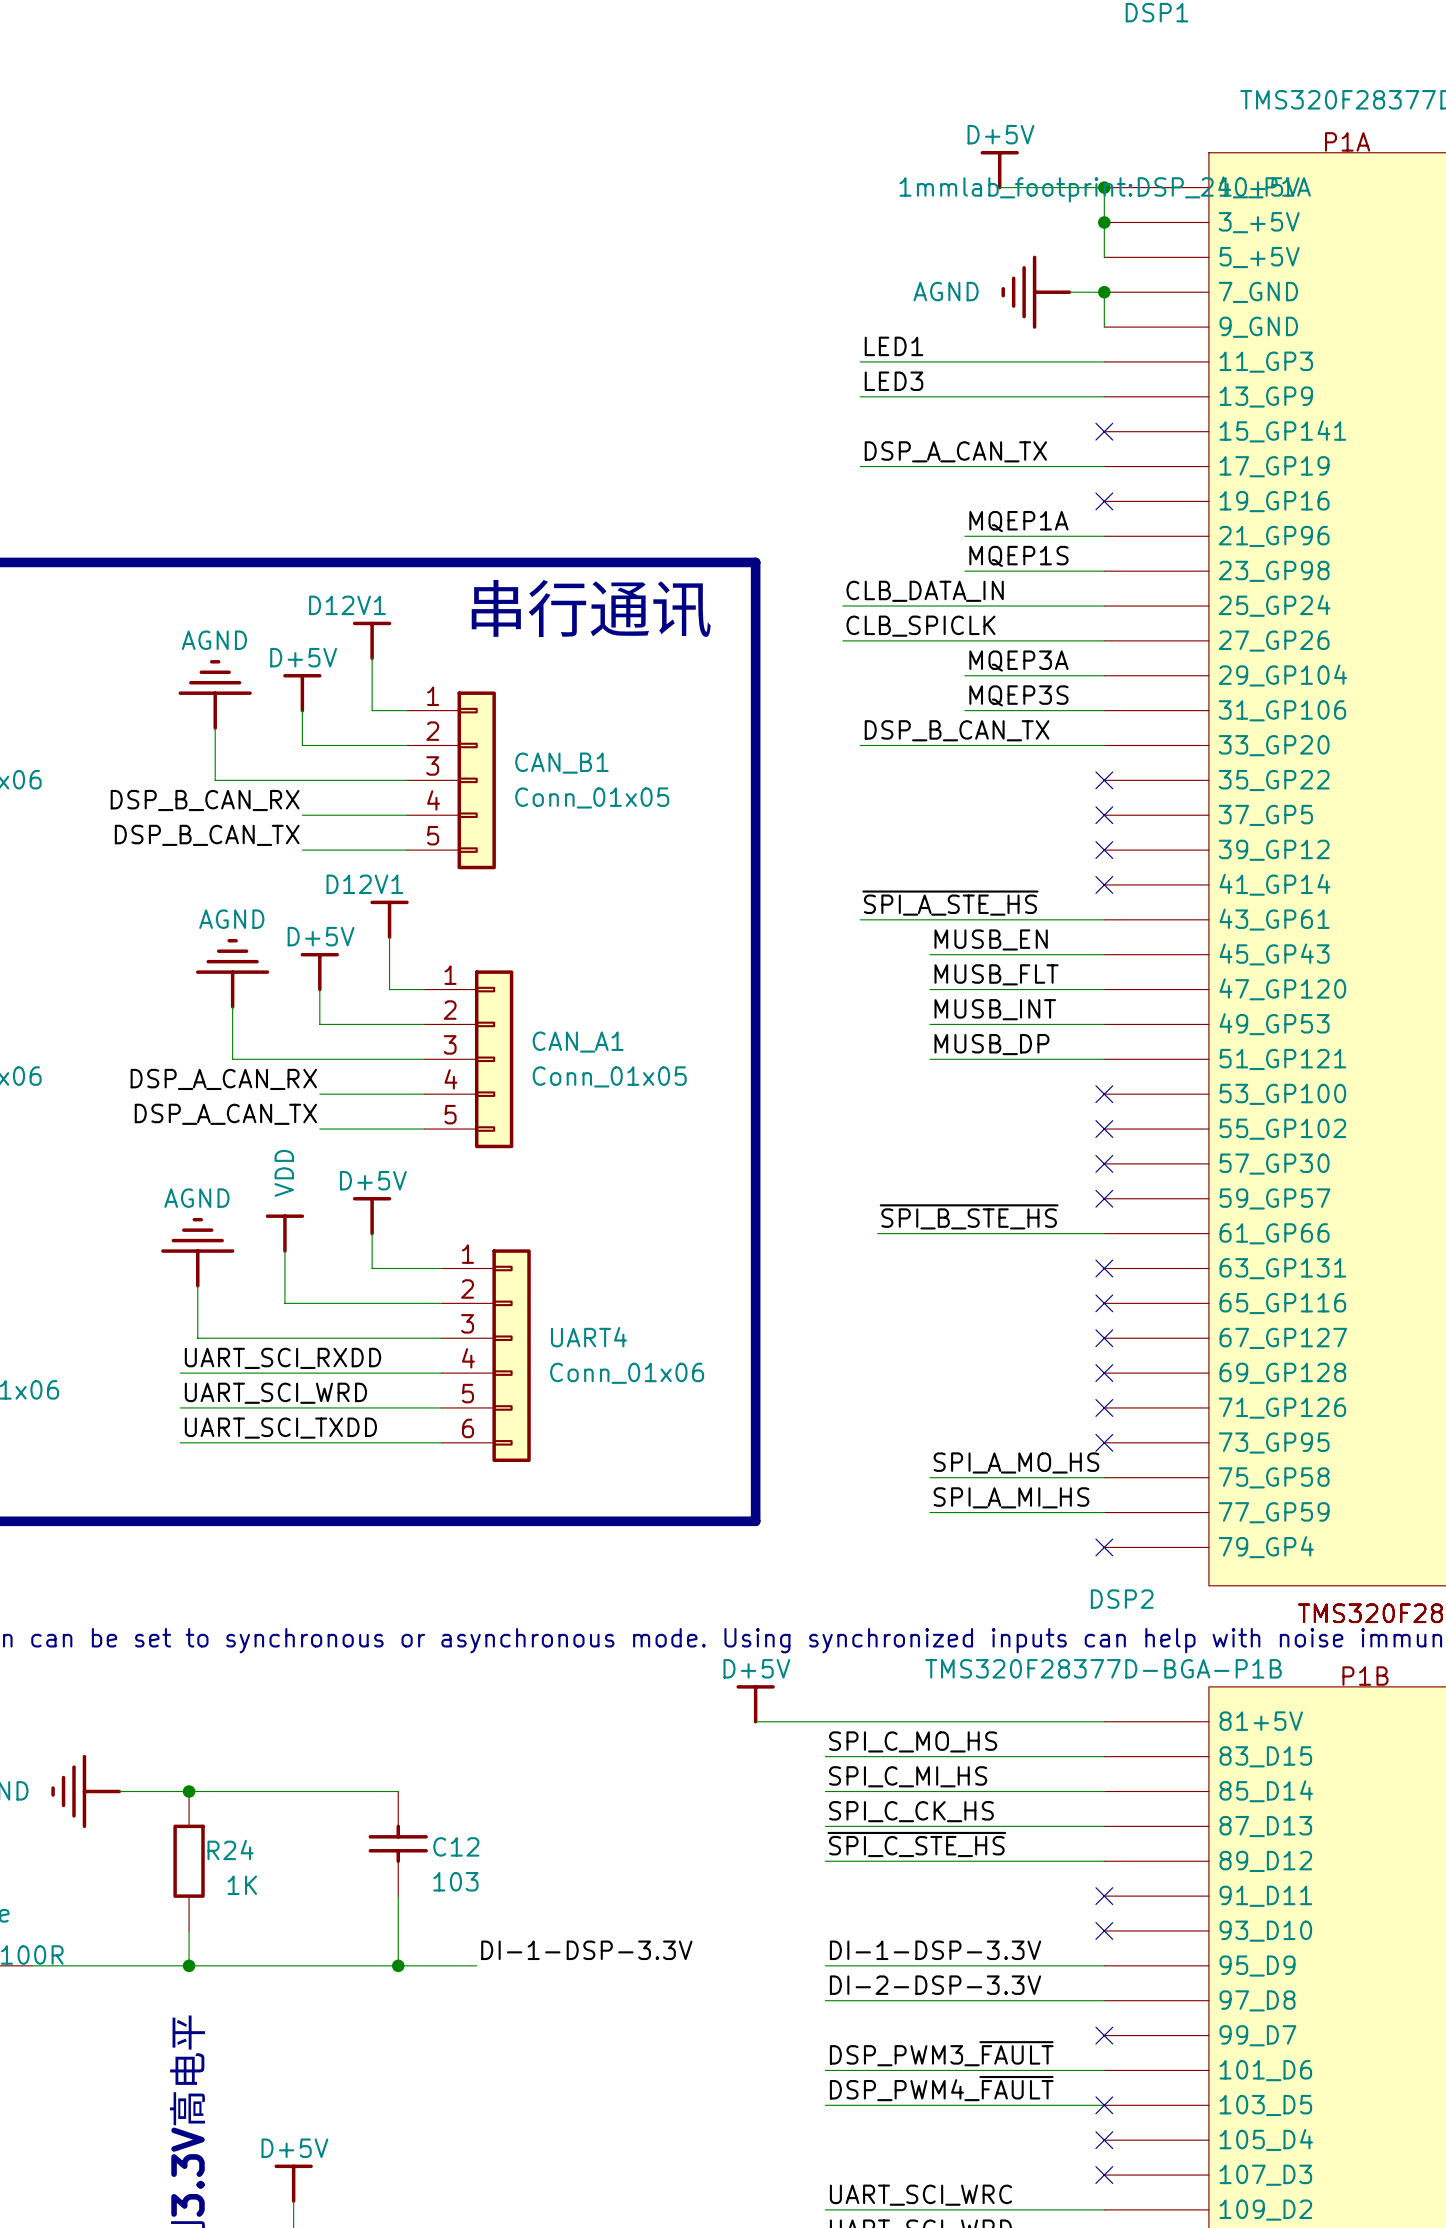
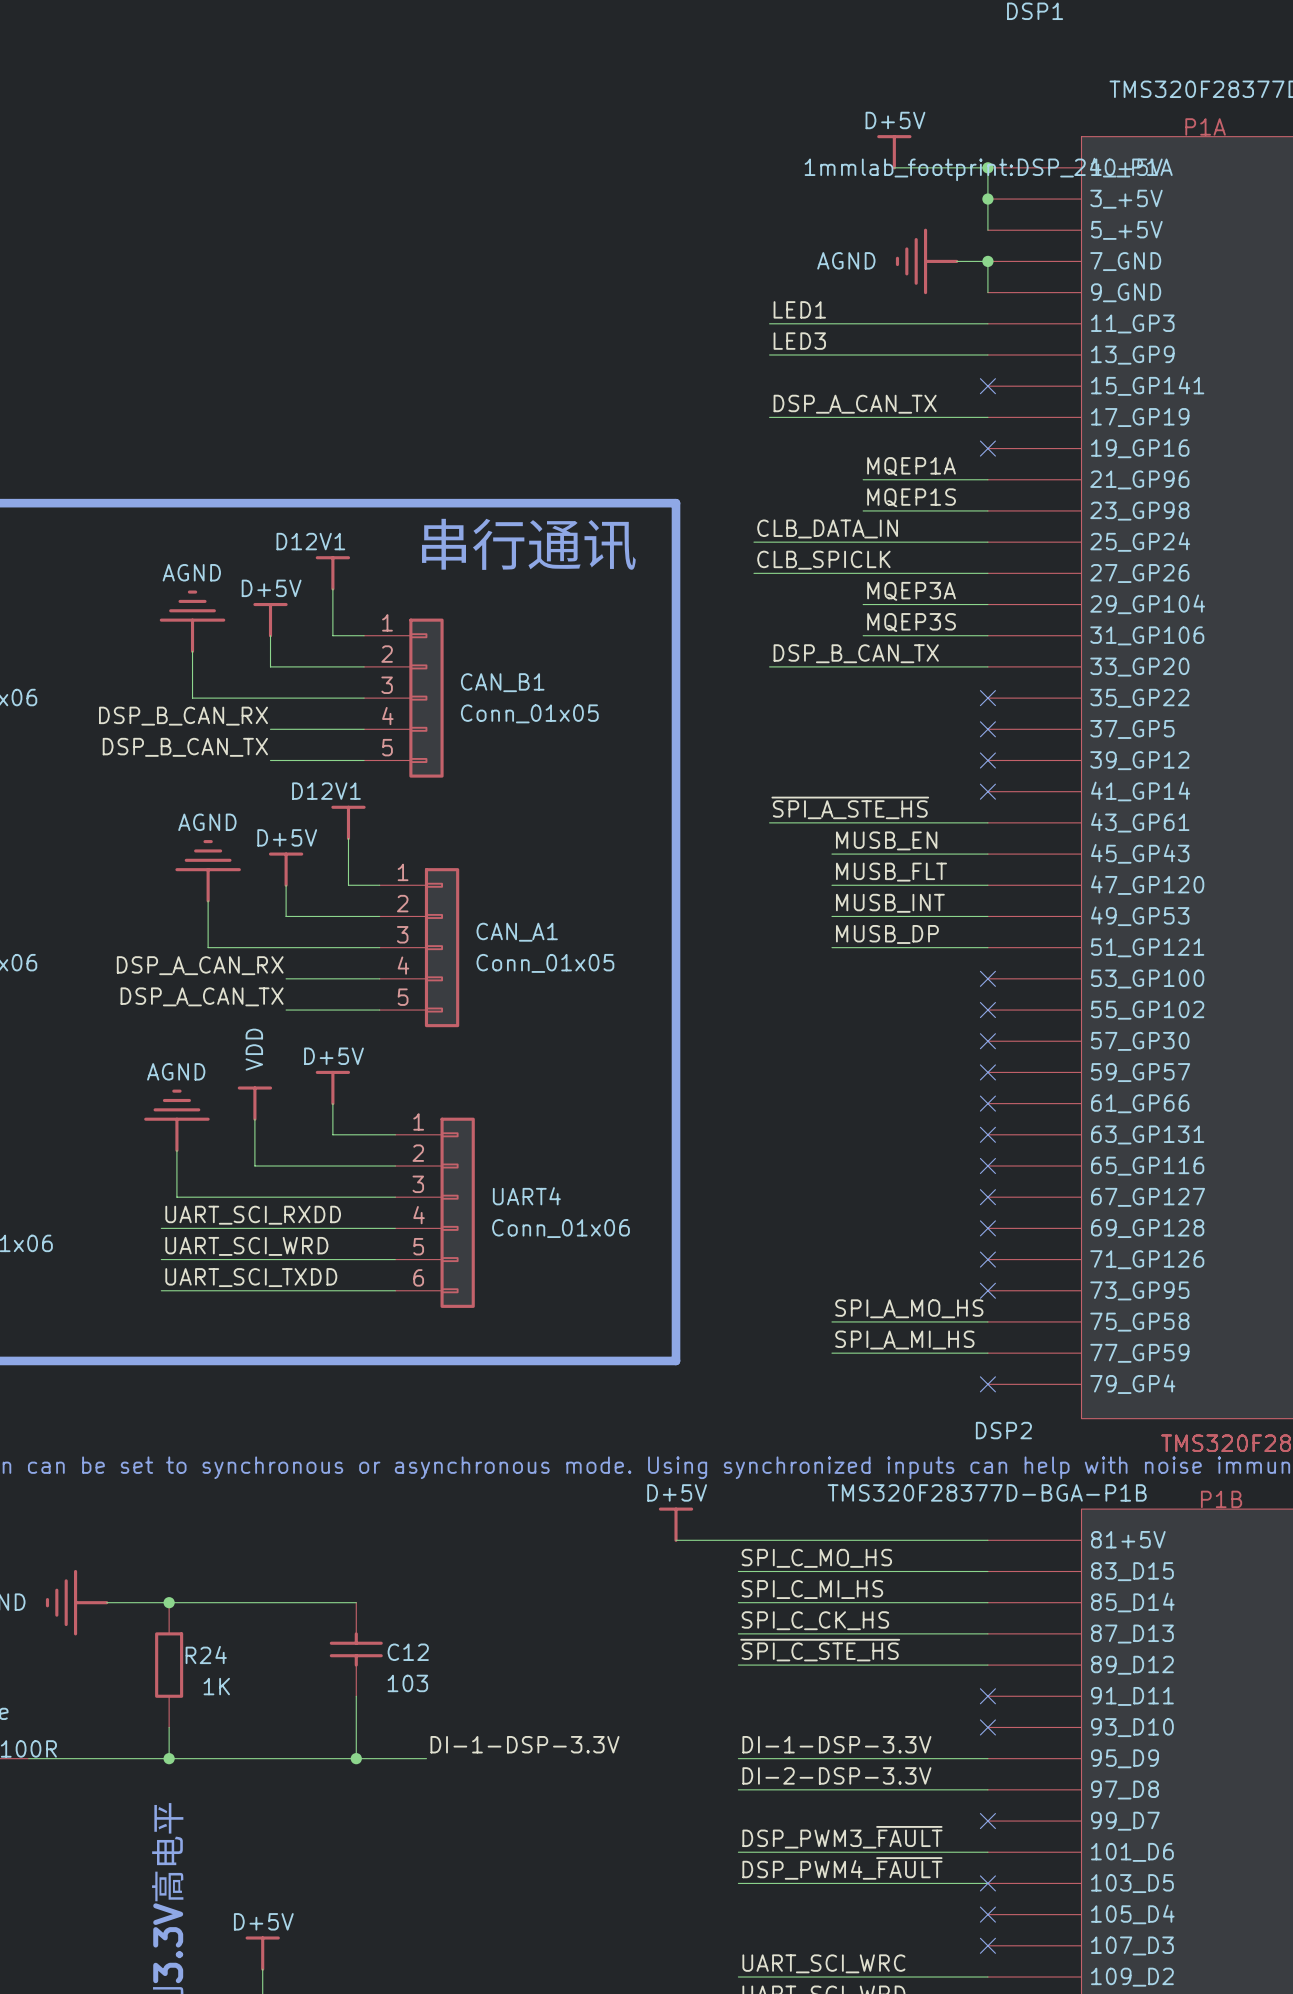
label: ~{SPI_B_STE_HS} (969, 1216) -> none
wire: (877, 1233) (1104, 1233) -> none
no-connect mark: none -> (987, 1103)

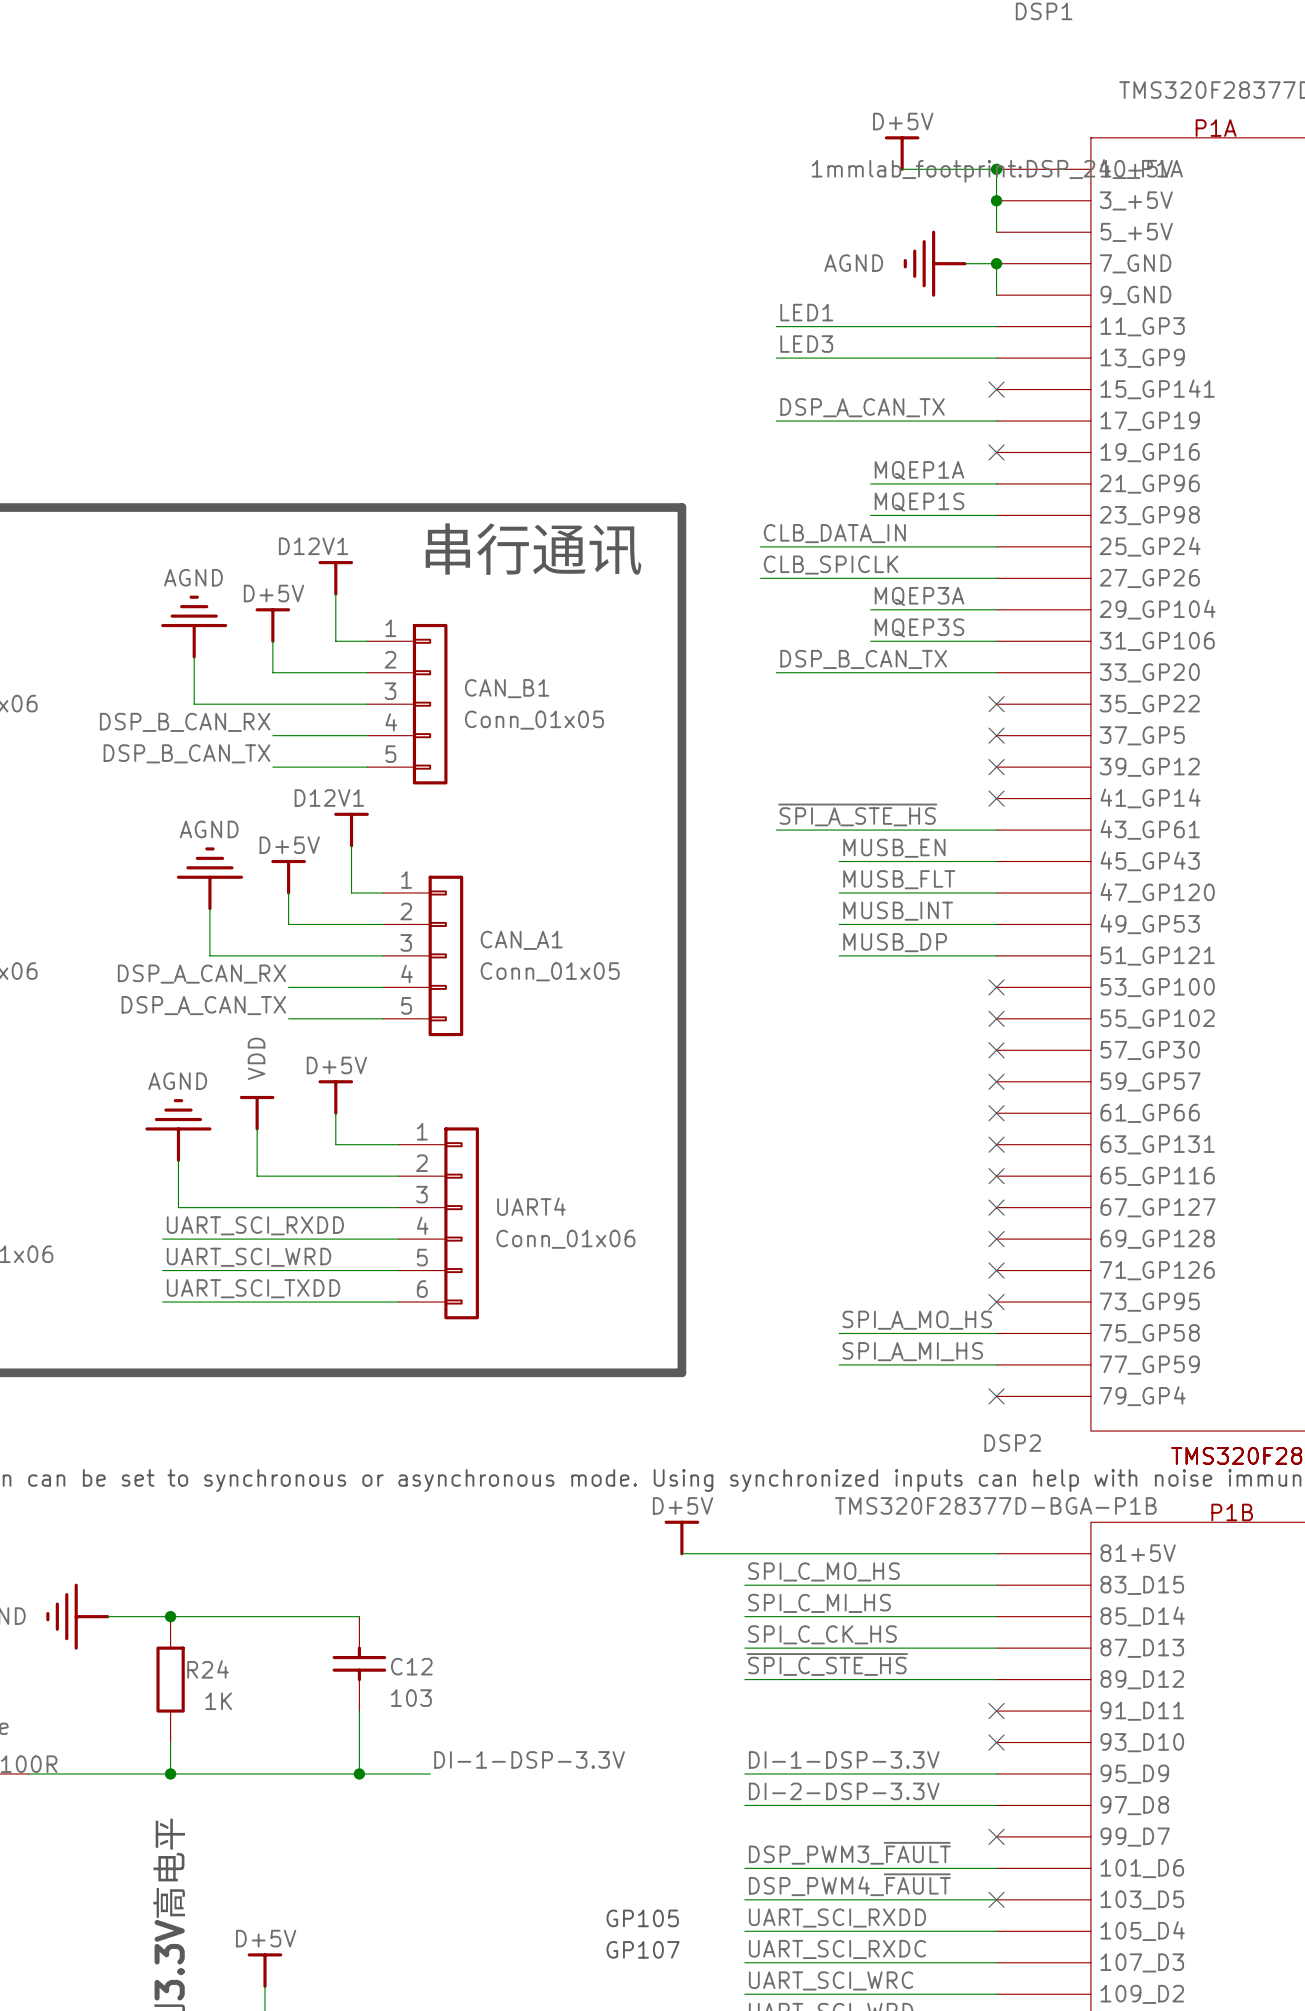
text: none -> GP105 (642, 1918)
label: none -> UART_SCI_RXDD (837, 1918)
wire: none -> (744, 1931) (996, 1931)
no-connect mark: (987, 1914) -> none
label: none -> UART_SCI_RXDC (837, 1949)
text: none -> GP107 (643, 1949)
wire: none -> (744, 1962) (996, 1962)
no-connect mark: (987, 1945) -> none

